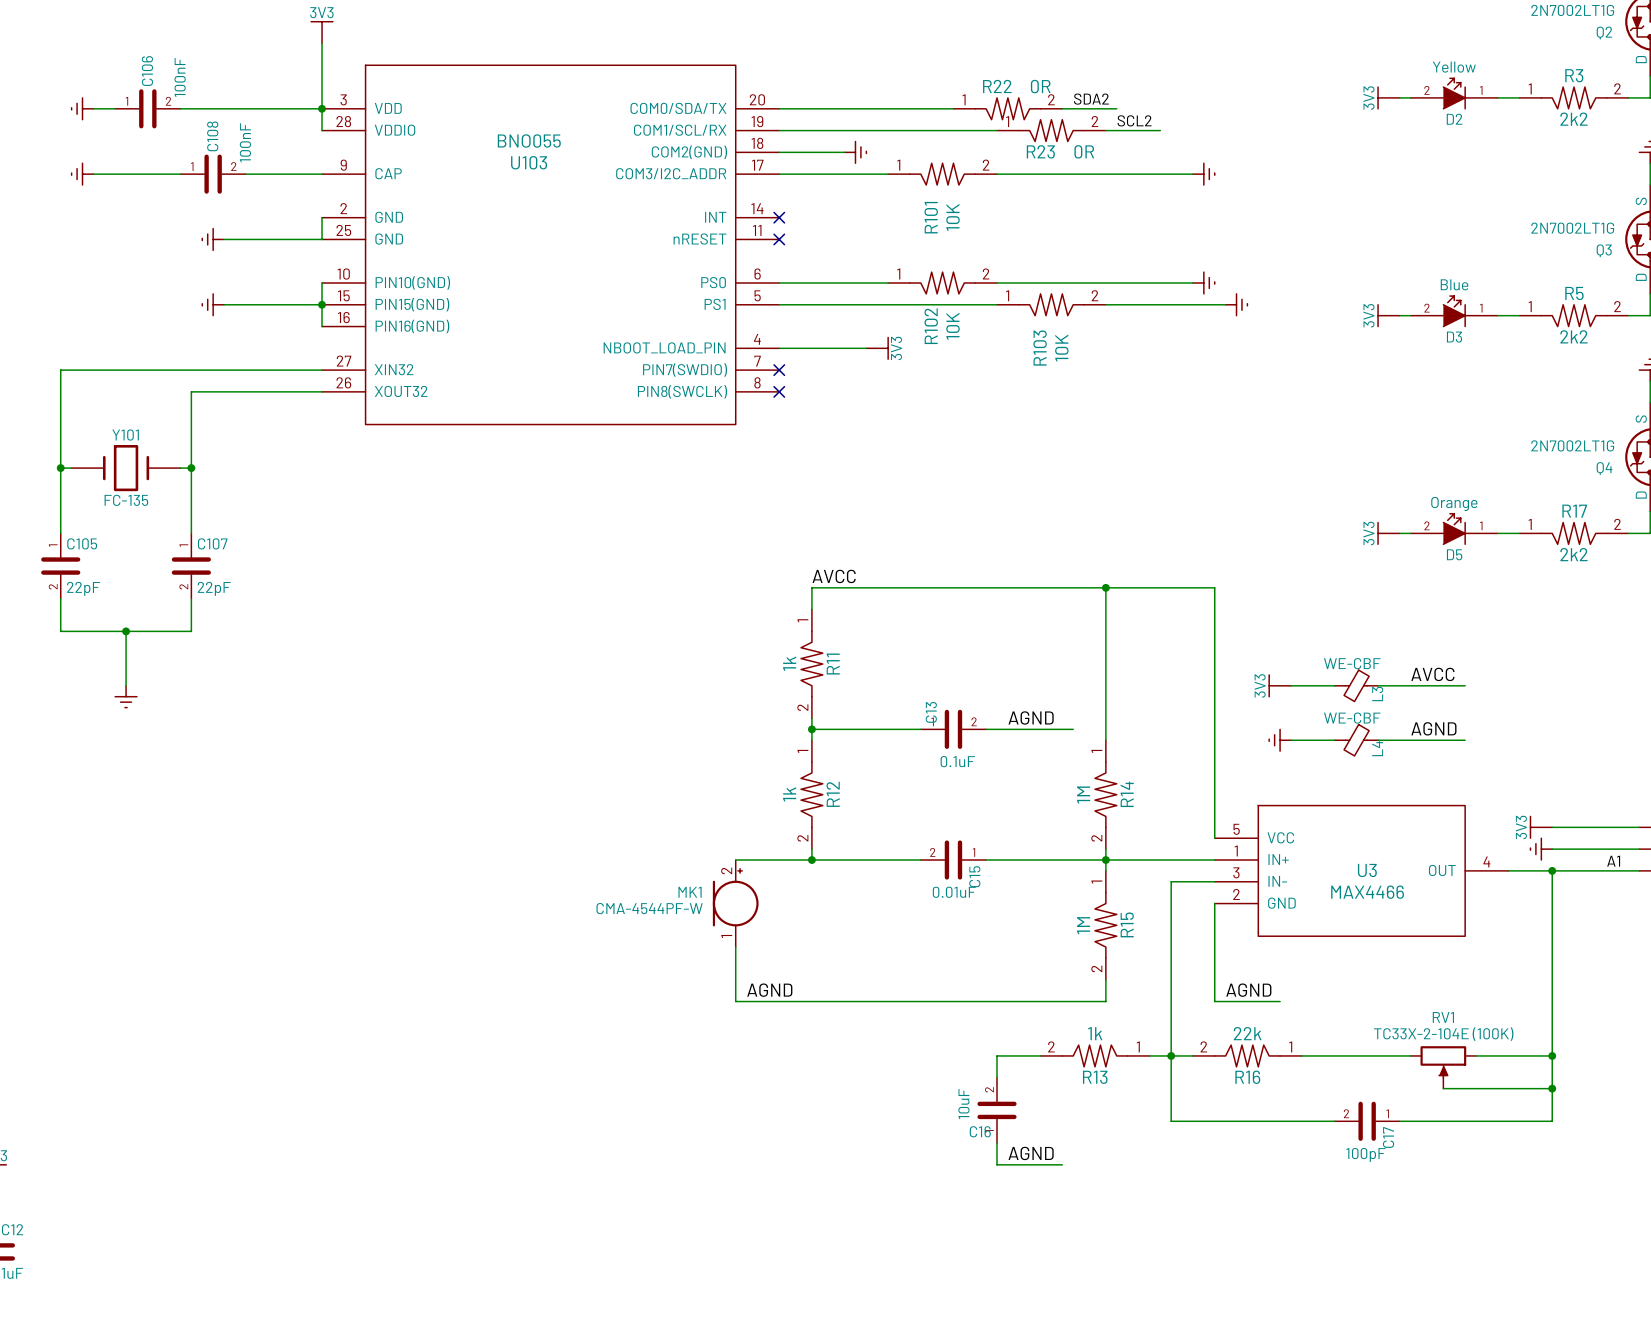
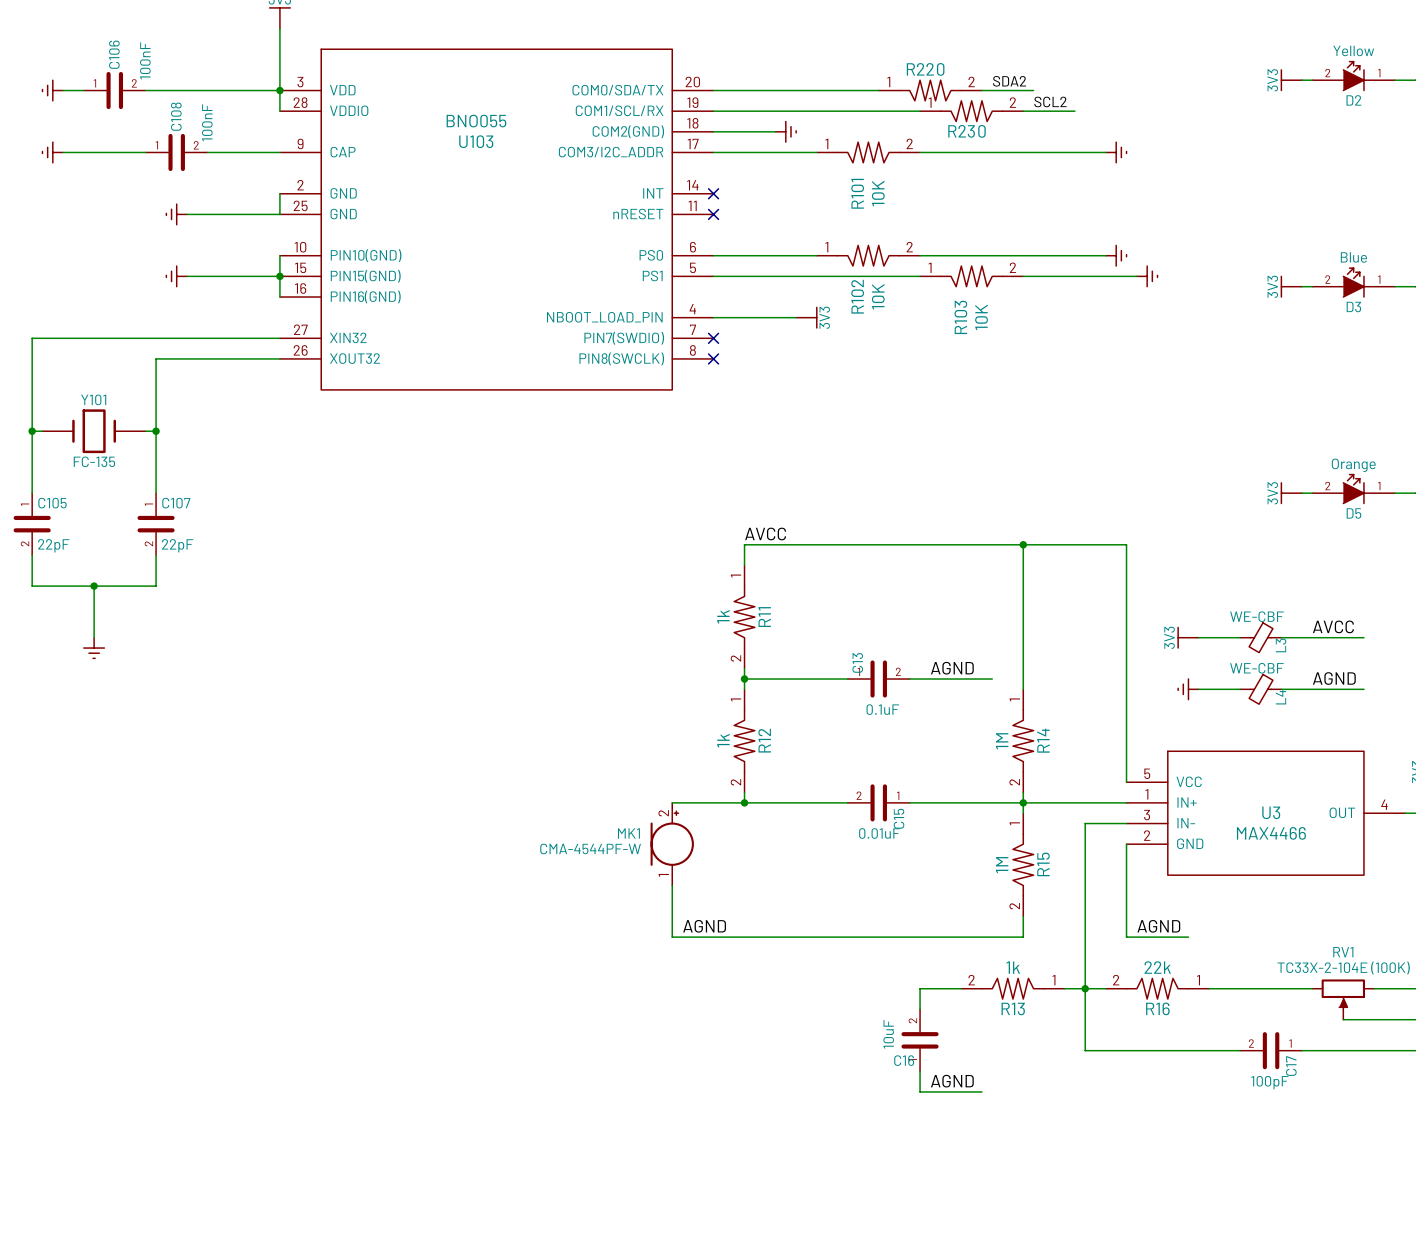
R22 value: 0R (1040, 86) -> 0 (940, 69)
R23 value: 0R (1084, 151) -> 0 (981, 131)

